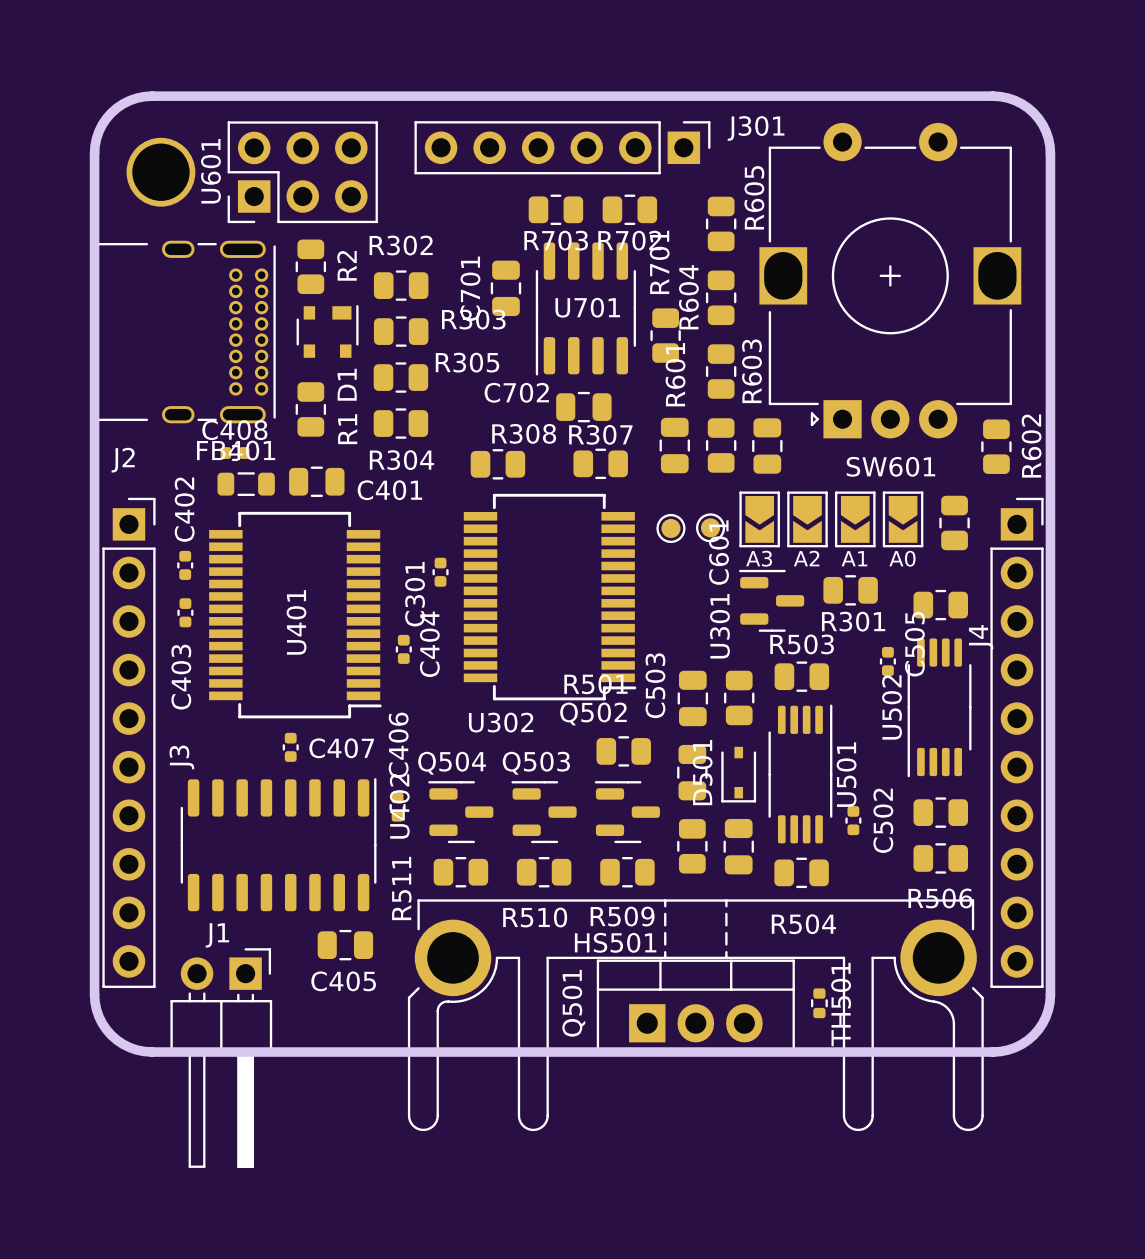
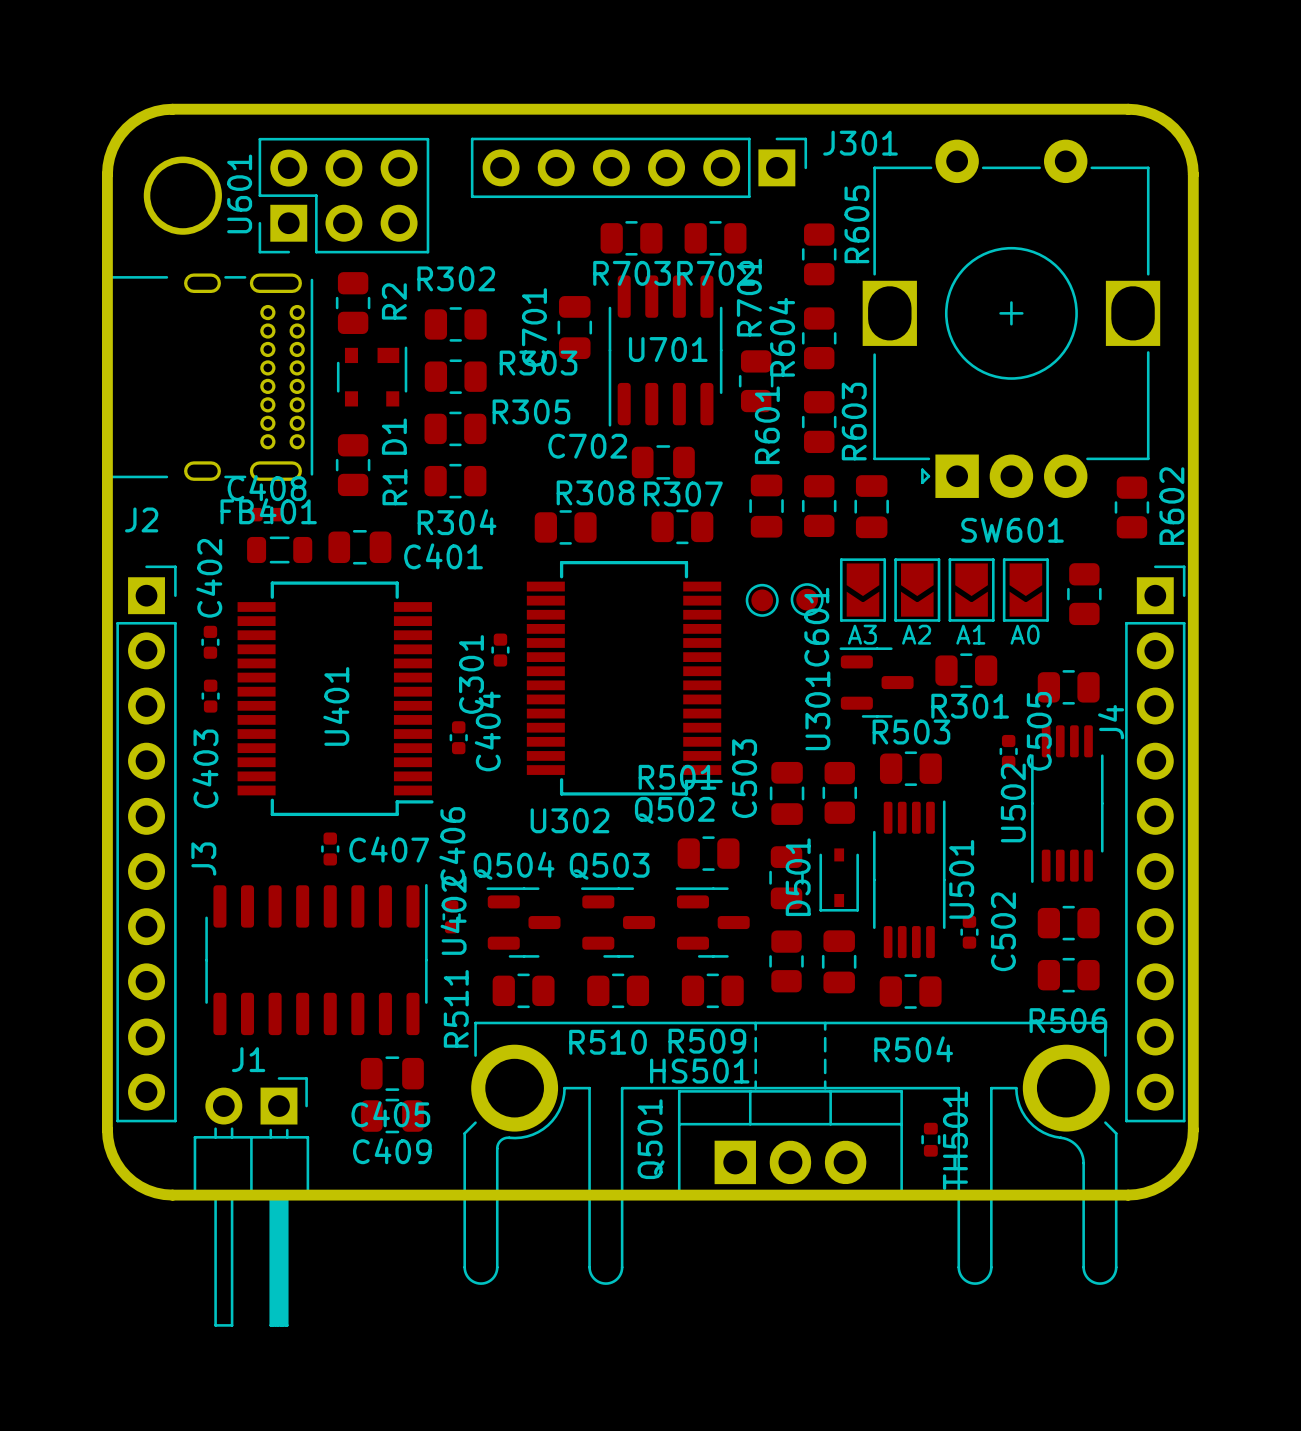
C409: none -> (392, 1116)

